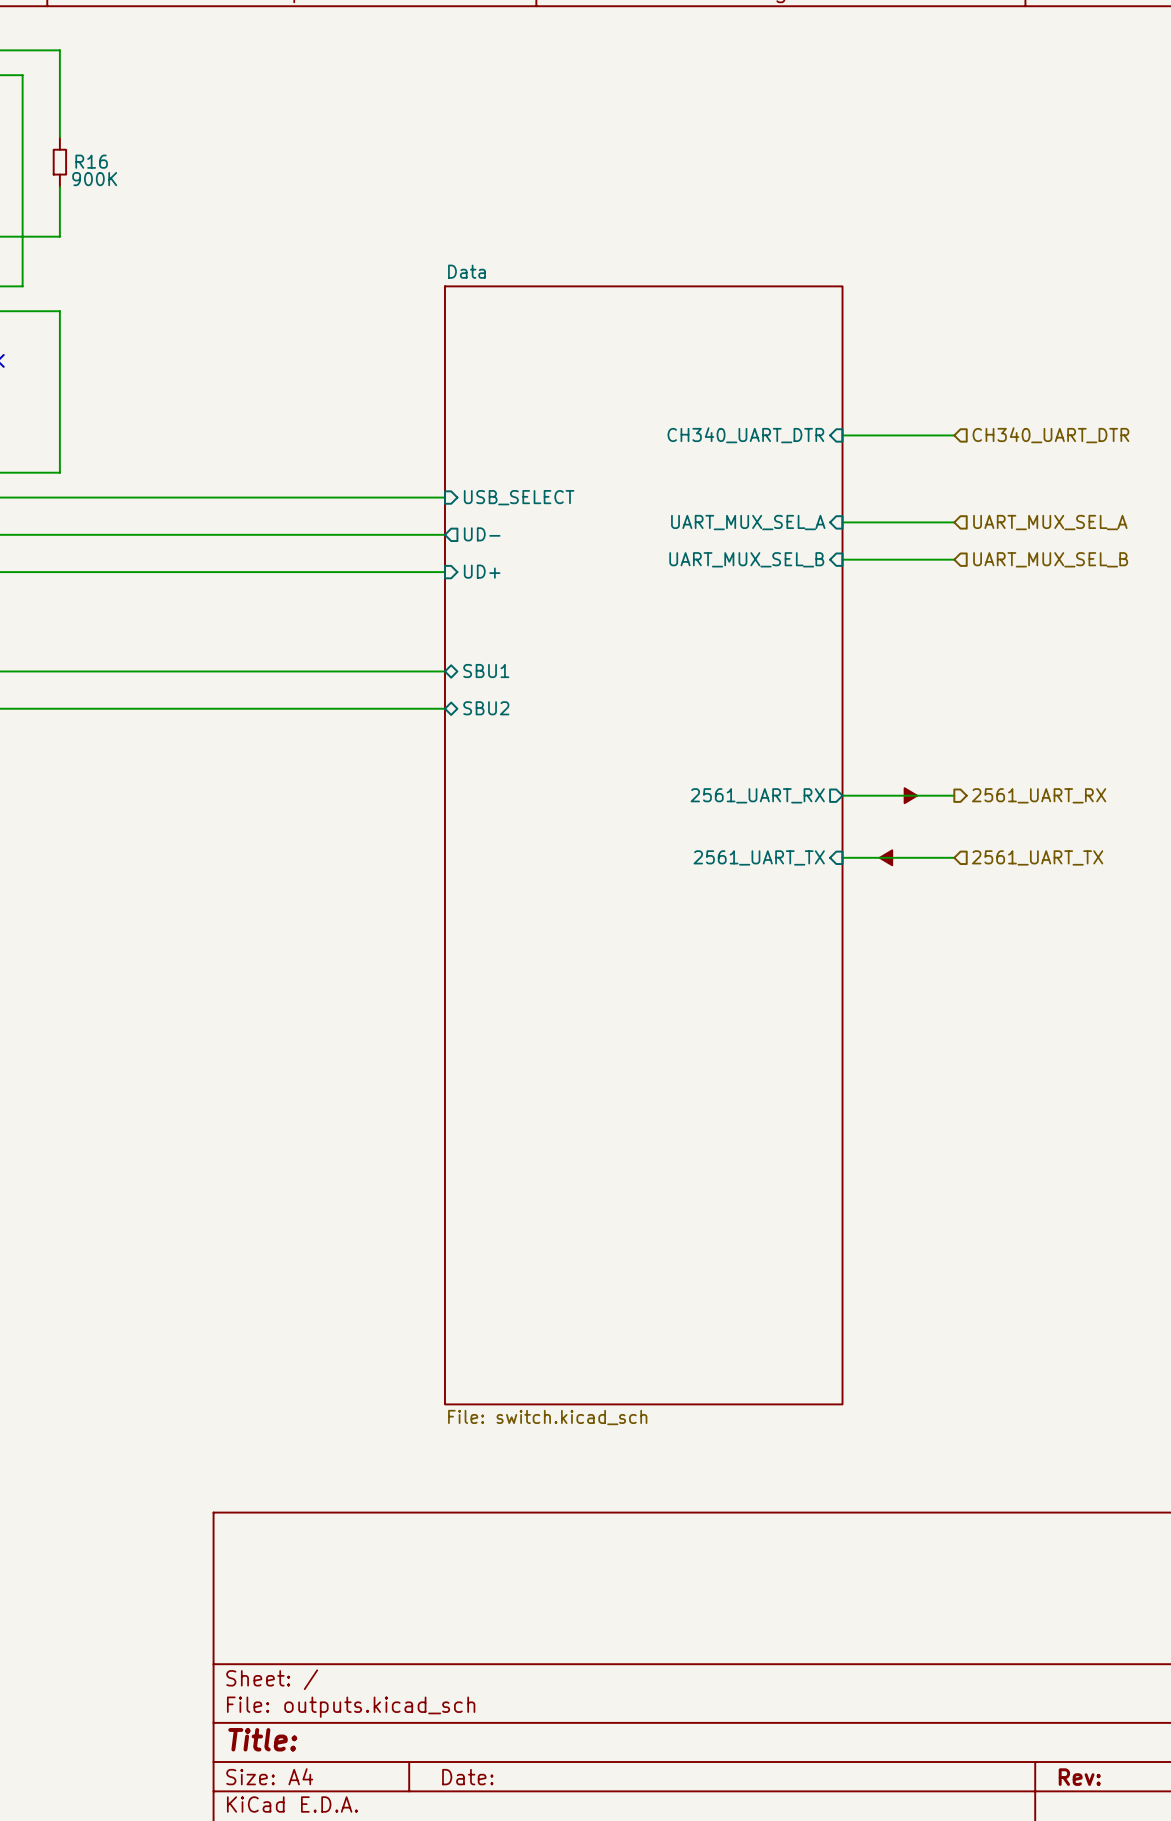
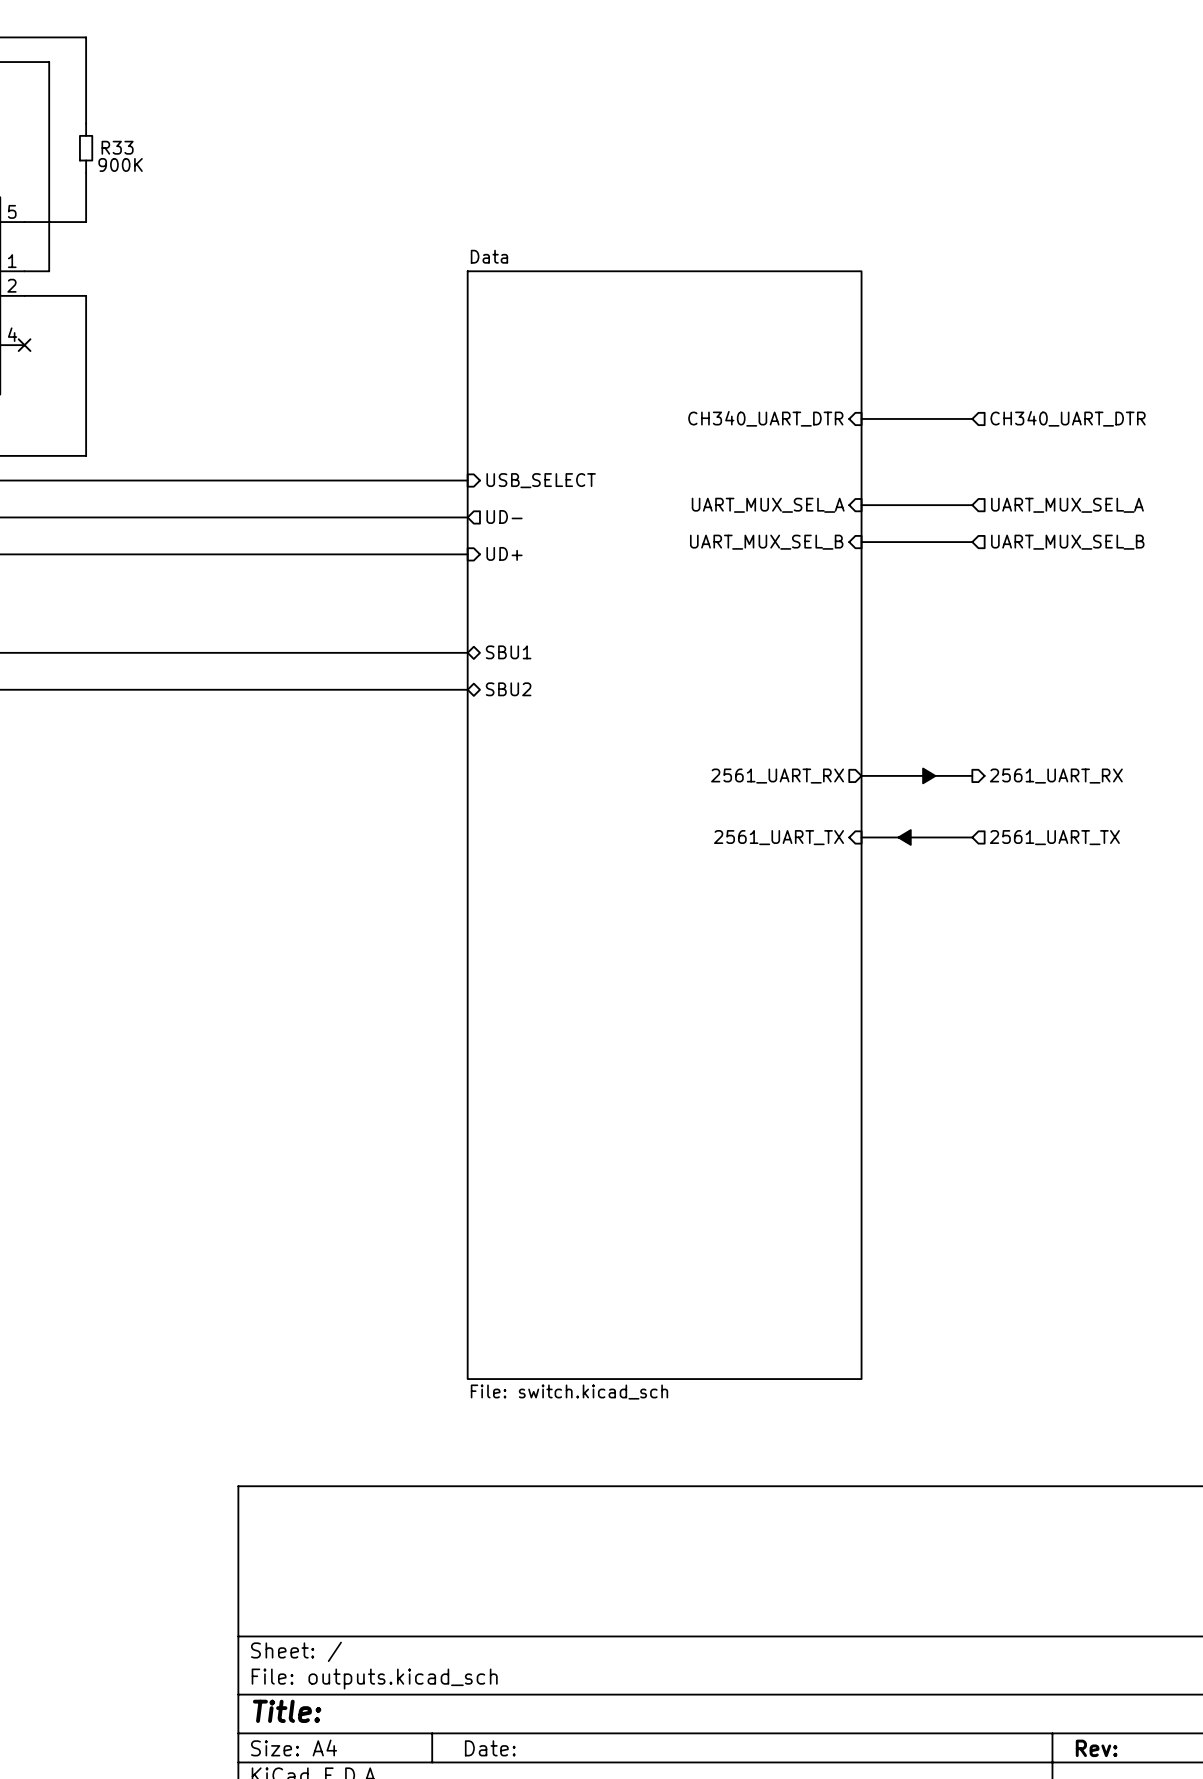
R16 name: R16 (91, 161) -> R33 (117, 147)

